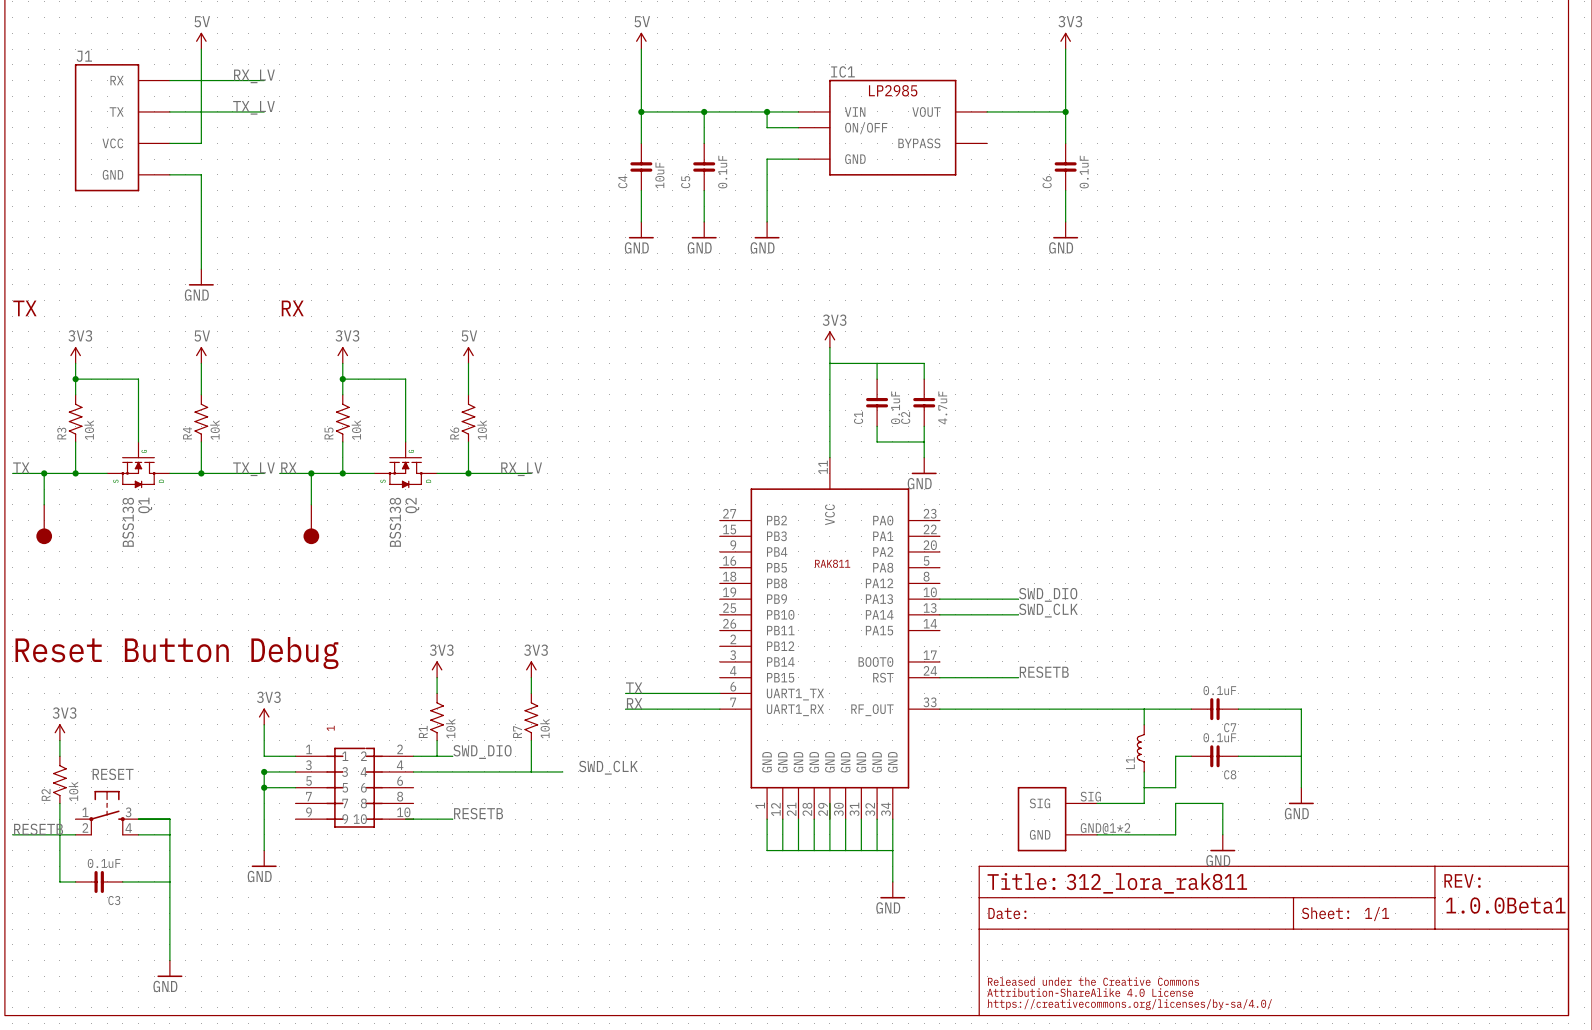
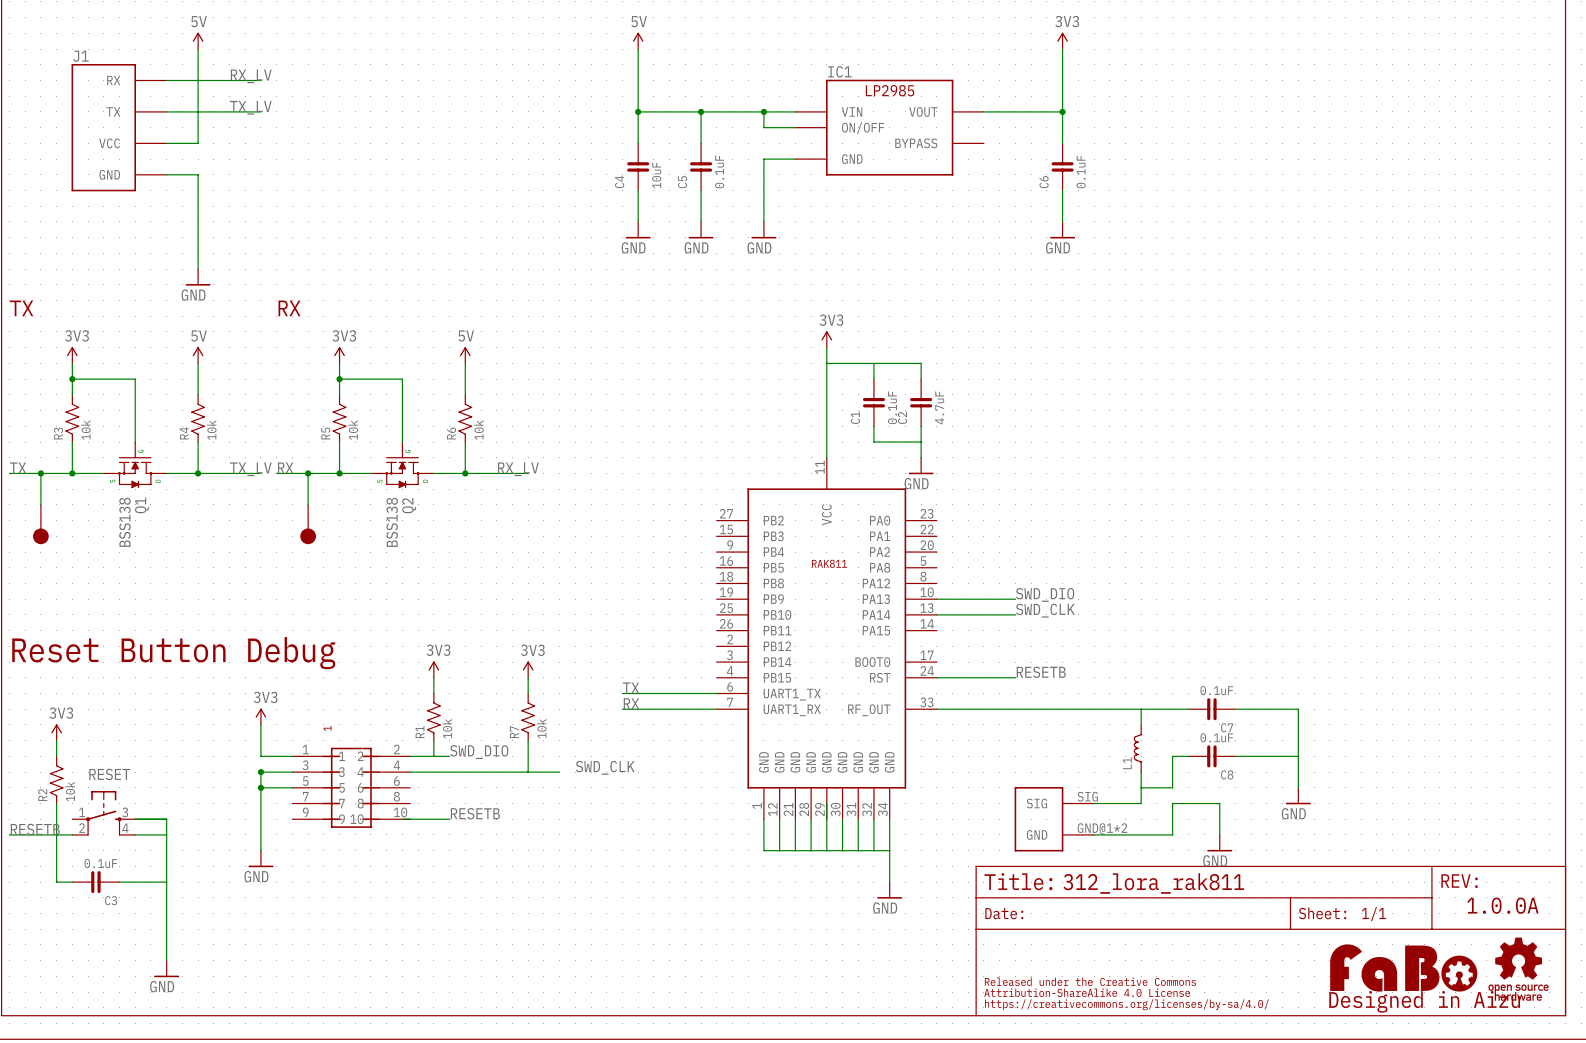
text: 1.0.0Beta1 (1505, 905) -> 1.0.0A (1502, 905)
part: none -> (1403, 968)
part: none -> (1518, 969)

